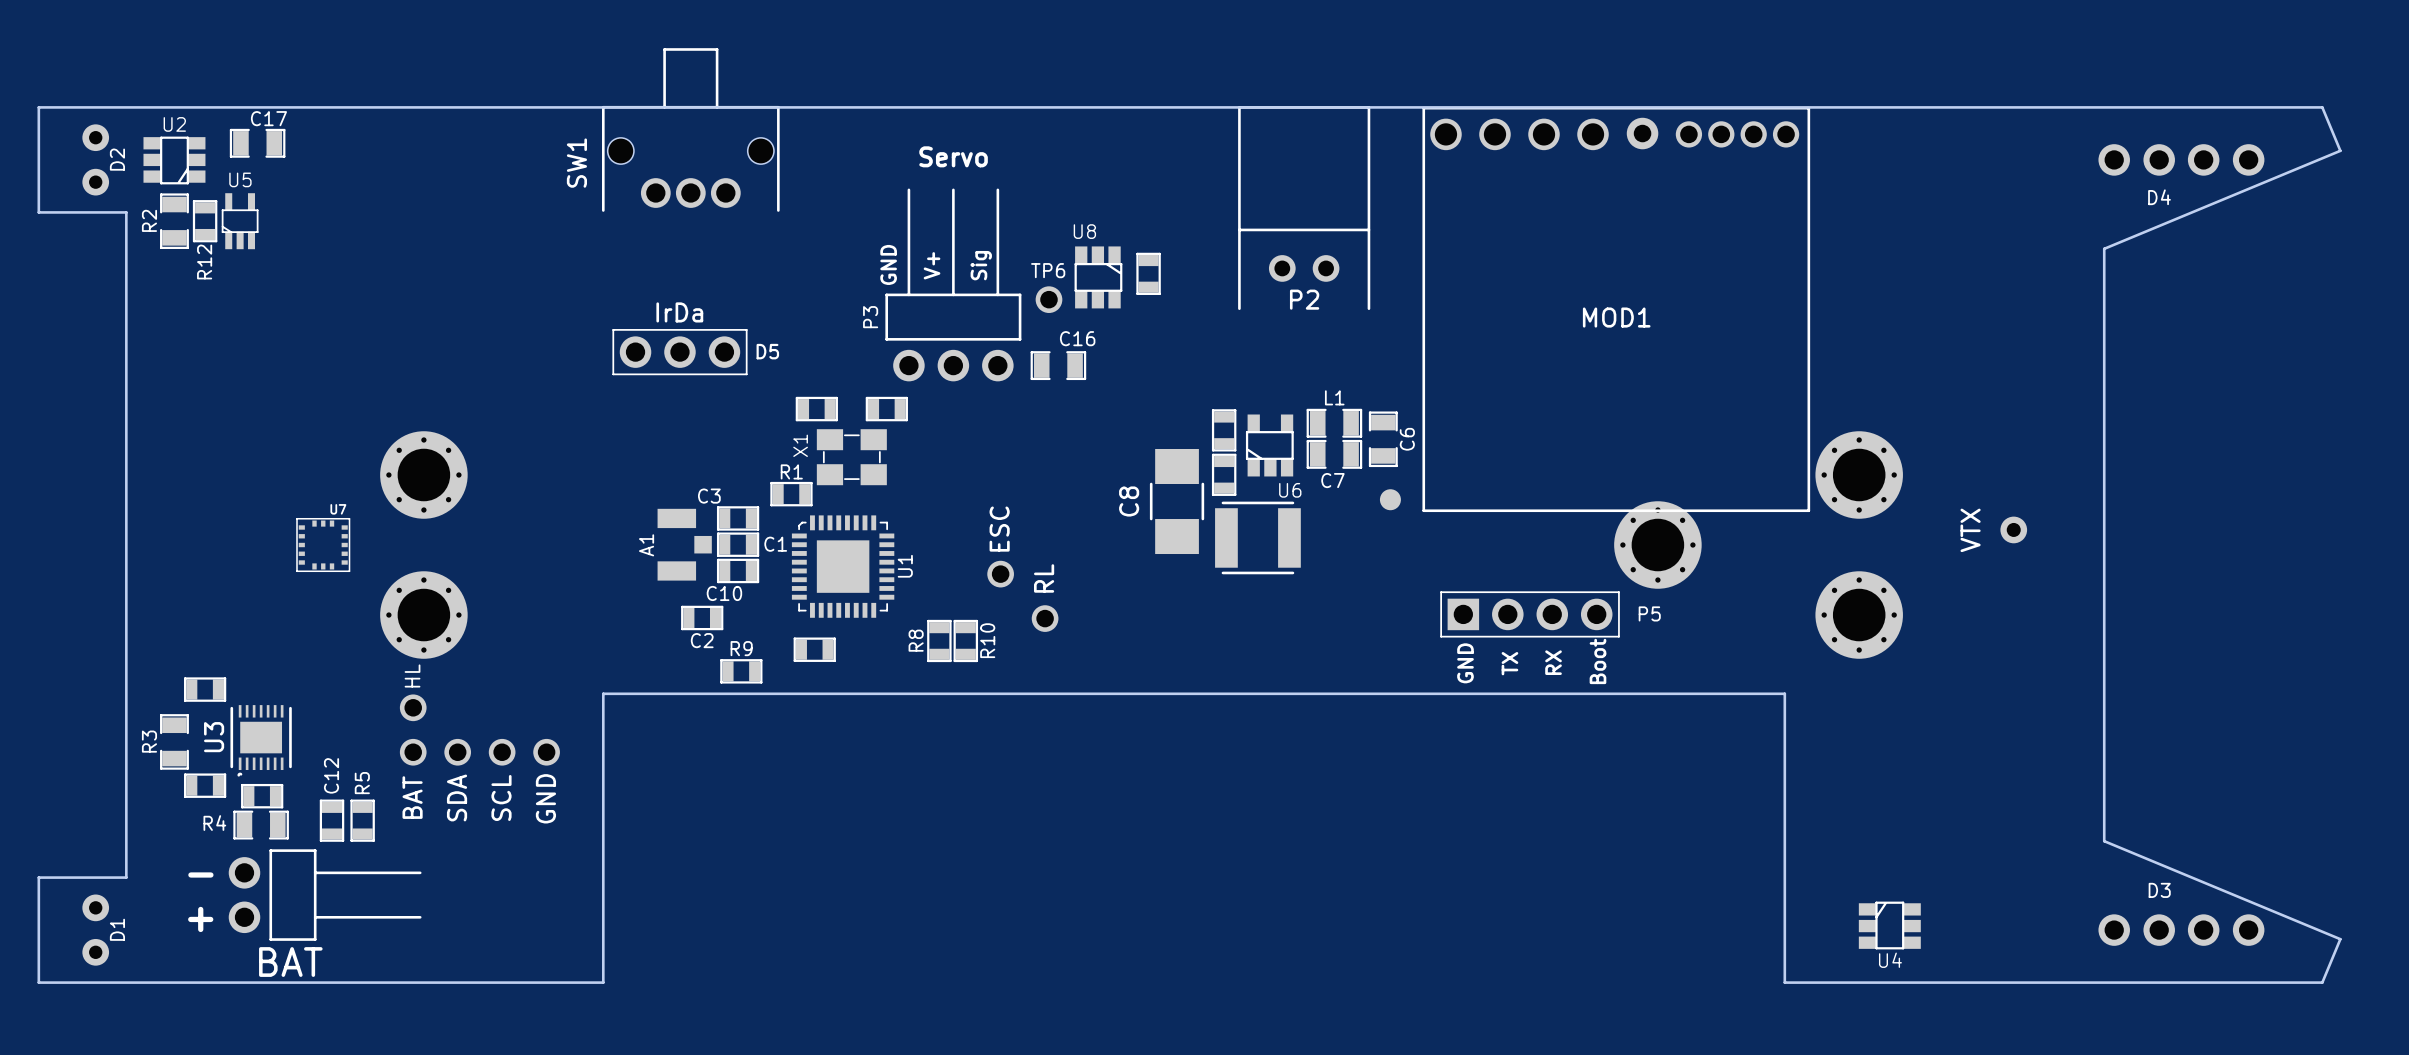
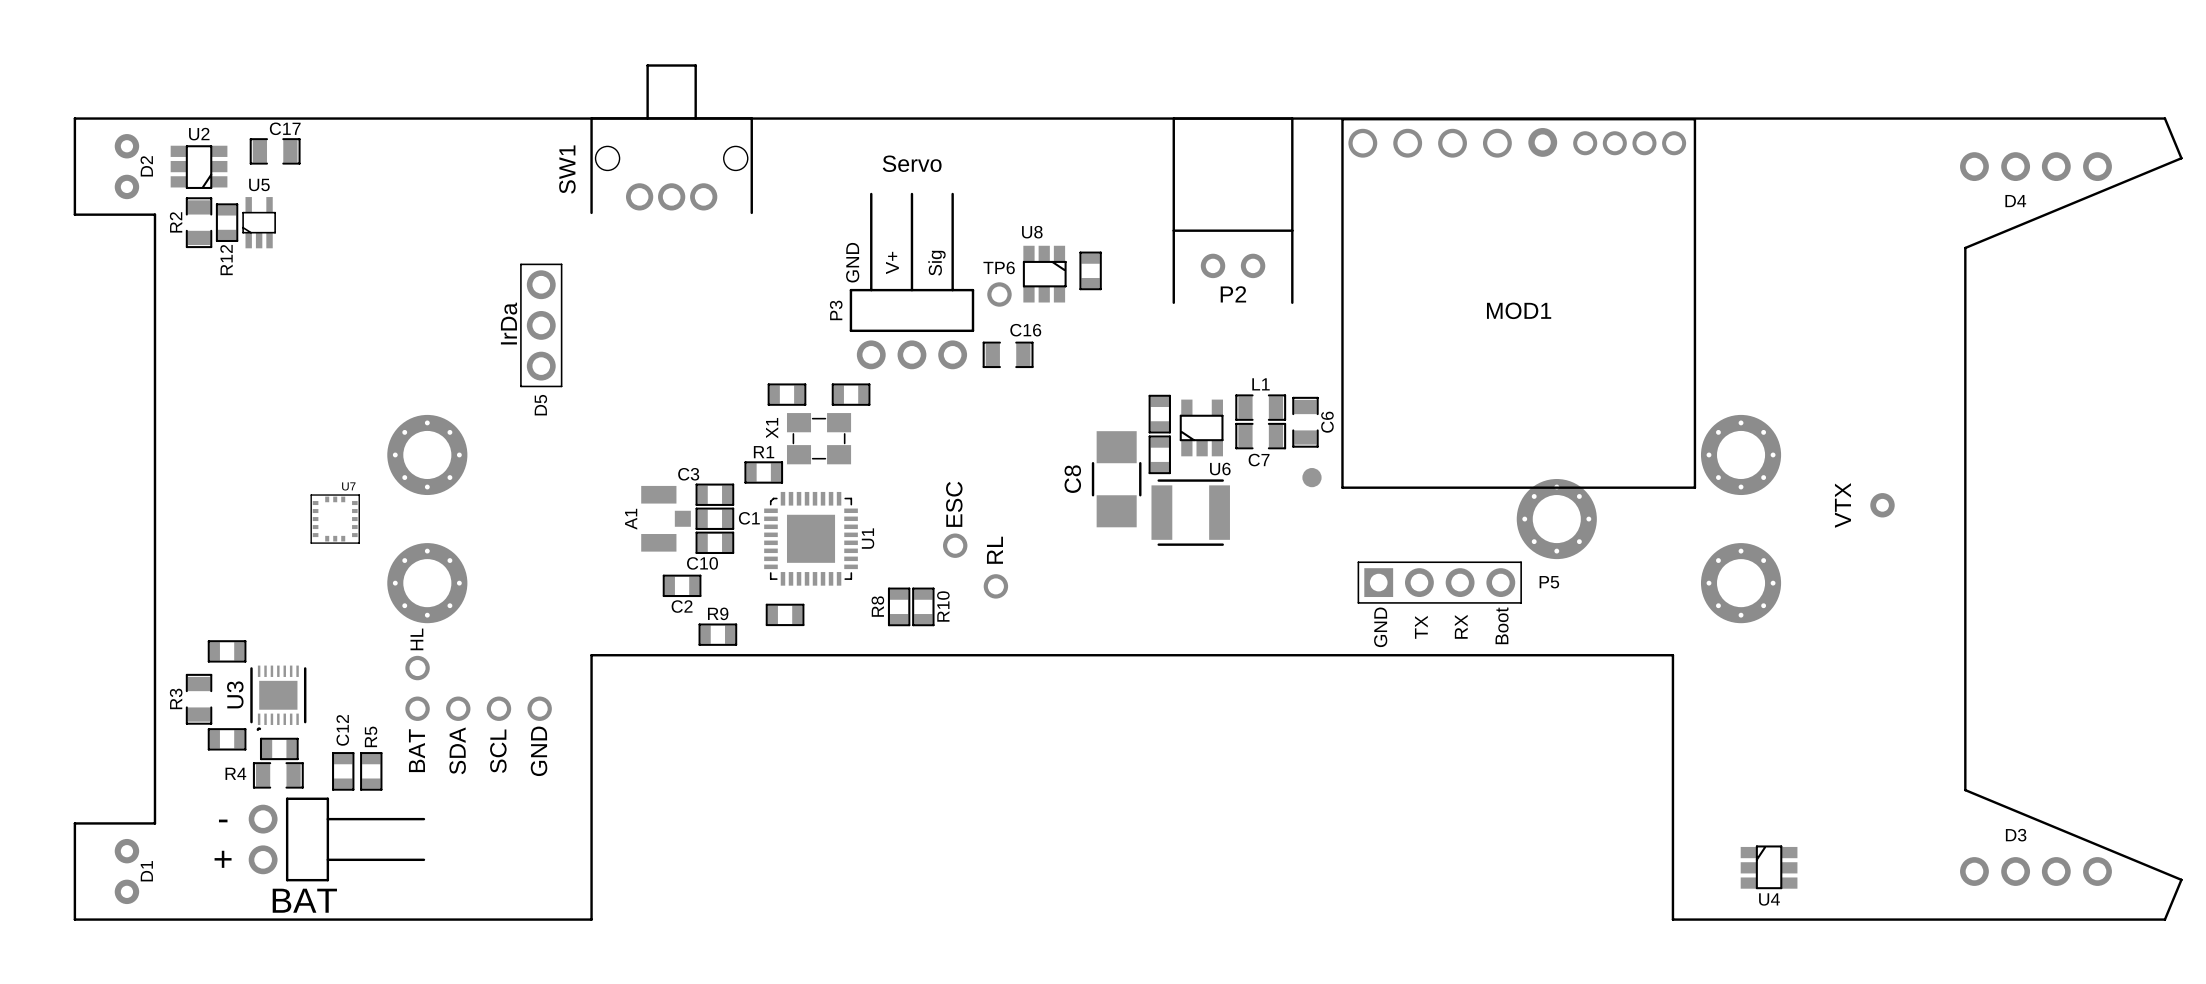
text rotation: 0° (679, 312) -> 90° counterclockwise (509, 323)
text position: IrDa (679, 312) -> IrDa (509, 323)
D5 rotation: 0° (679, 352) -> 90° clockwise (541, 325)
D5 position: (679, 352) -> (541, 325)

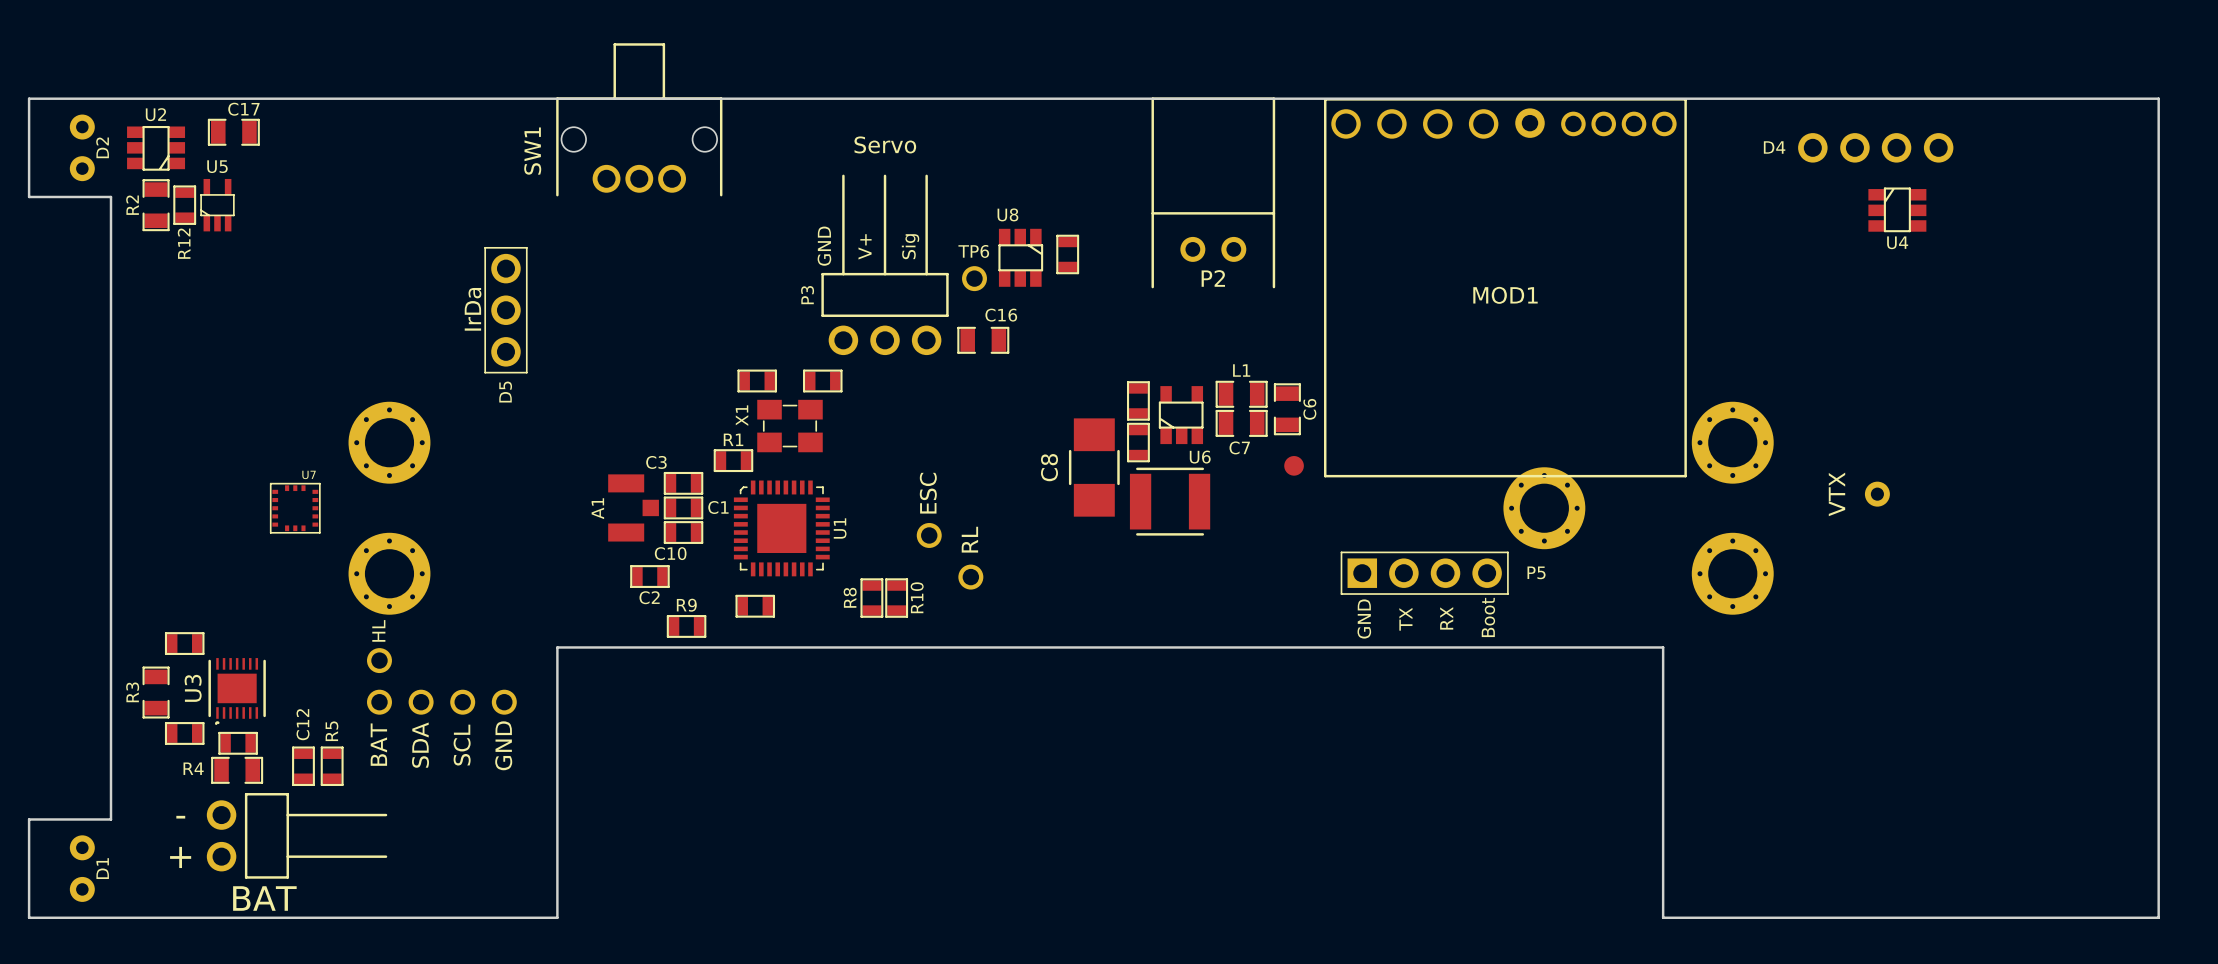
board edge: (2157, 118) (2164, 118) (2181, 158) (1965, 247) (1965, 790) (2181, 879) (2164, 919) (2157, 919) -> (2158, 98) (2158, 917)
D4 position: (2035, 166) -> (1875, 147)
D4 name position: D4 (2015, 201) -> D4 (1774, 147)
U4 position: (1769, 867) -> (1897, 209)
D3: (2035, 871) -> none

